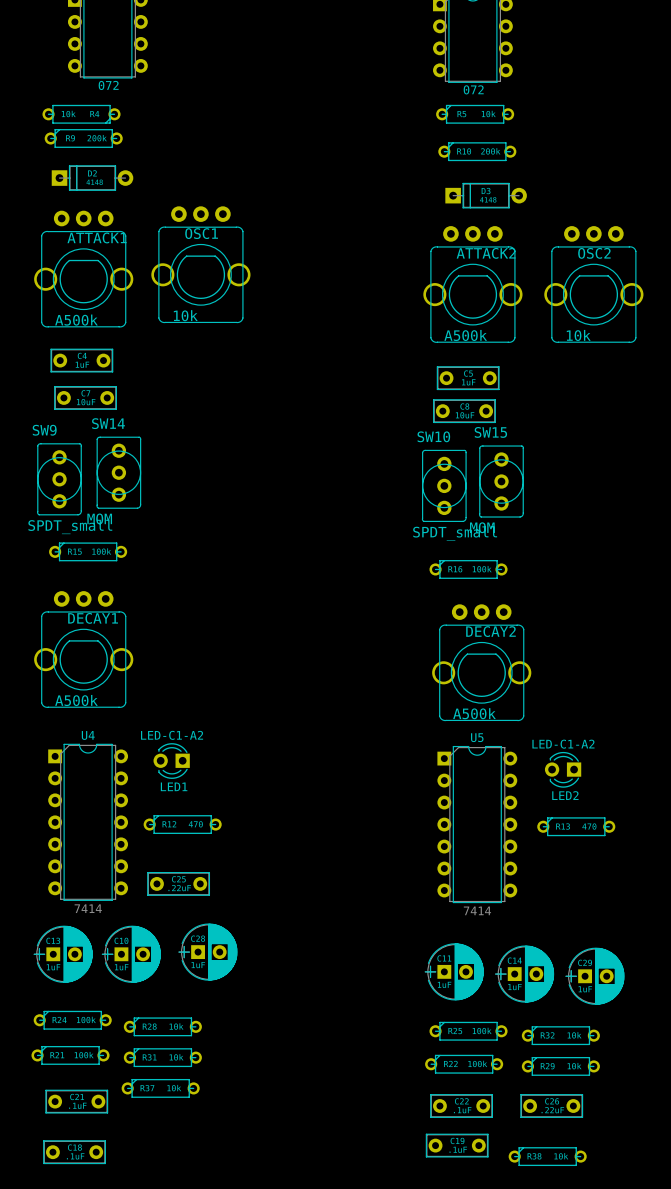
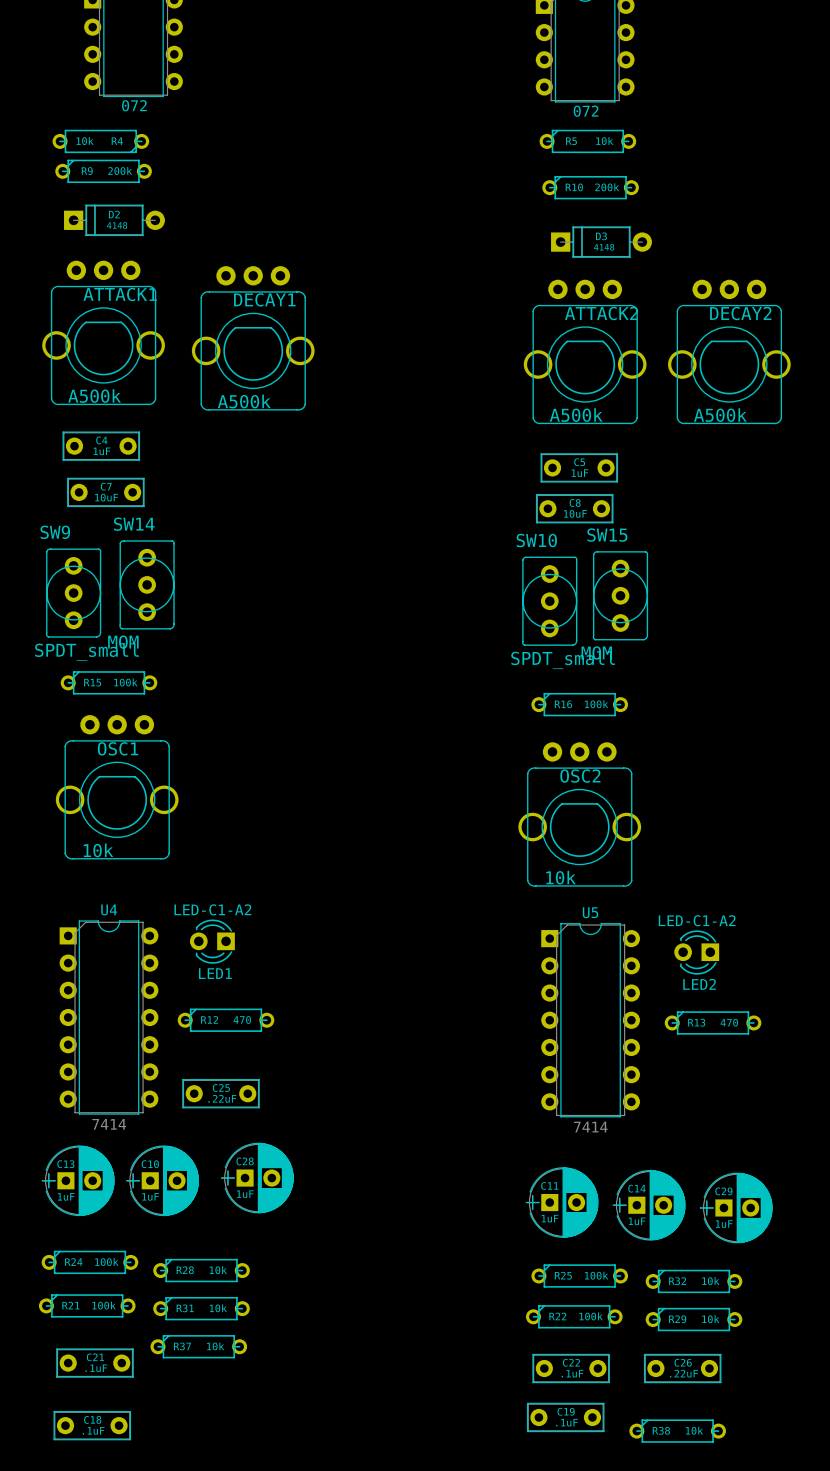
OSC1 position: (200, 264) -> (117, 787)
OSC2 position: (593, 284) -> (579, 814)
DECAY1 position: (83, 649) -> (253, 338)
DECAY2 position: (481, 662) -> (729, 351)

